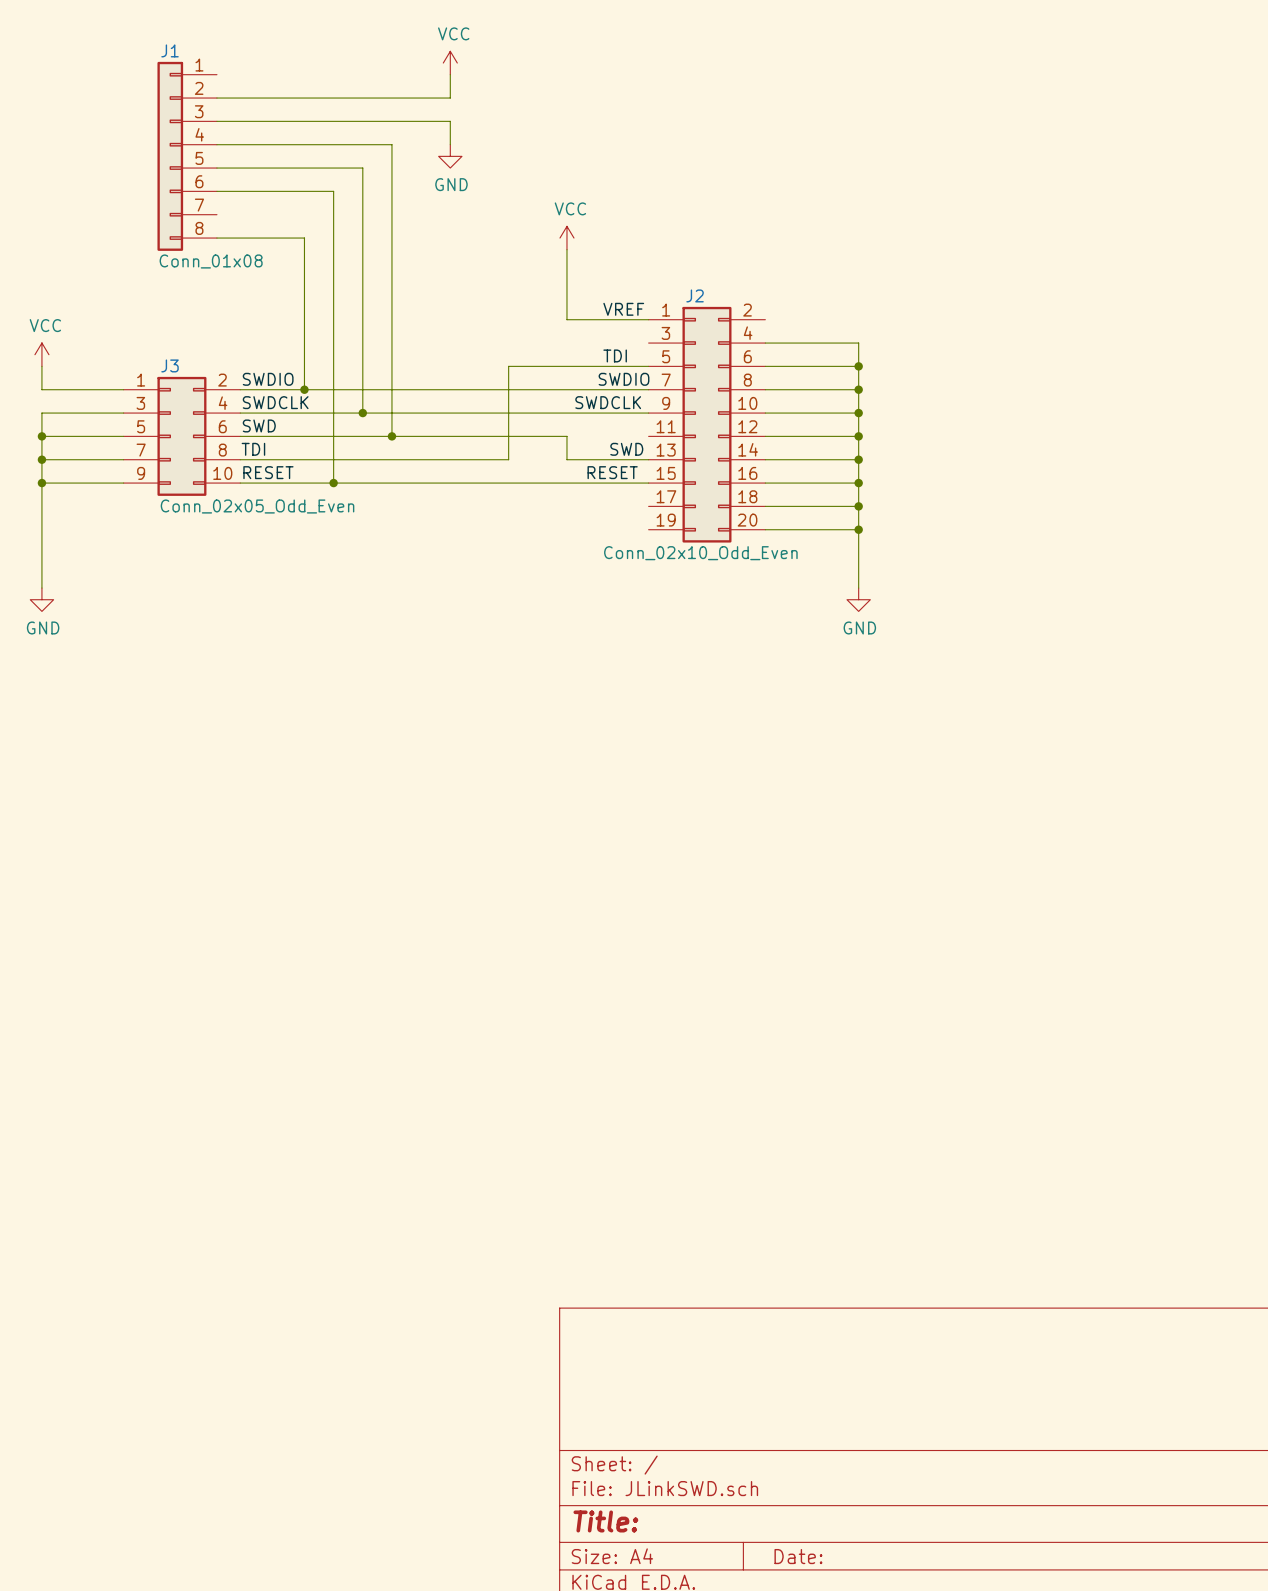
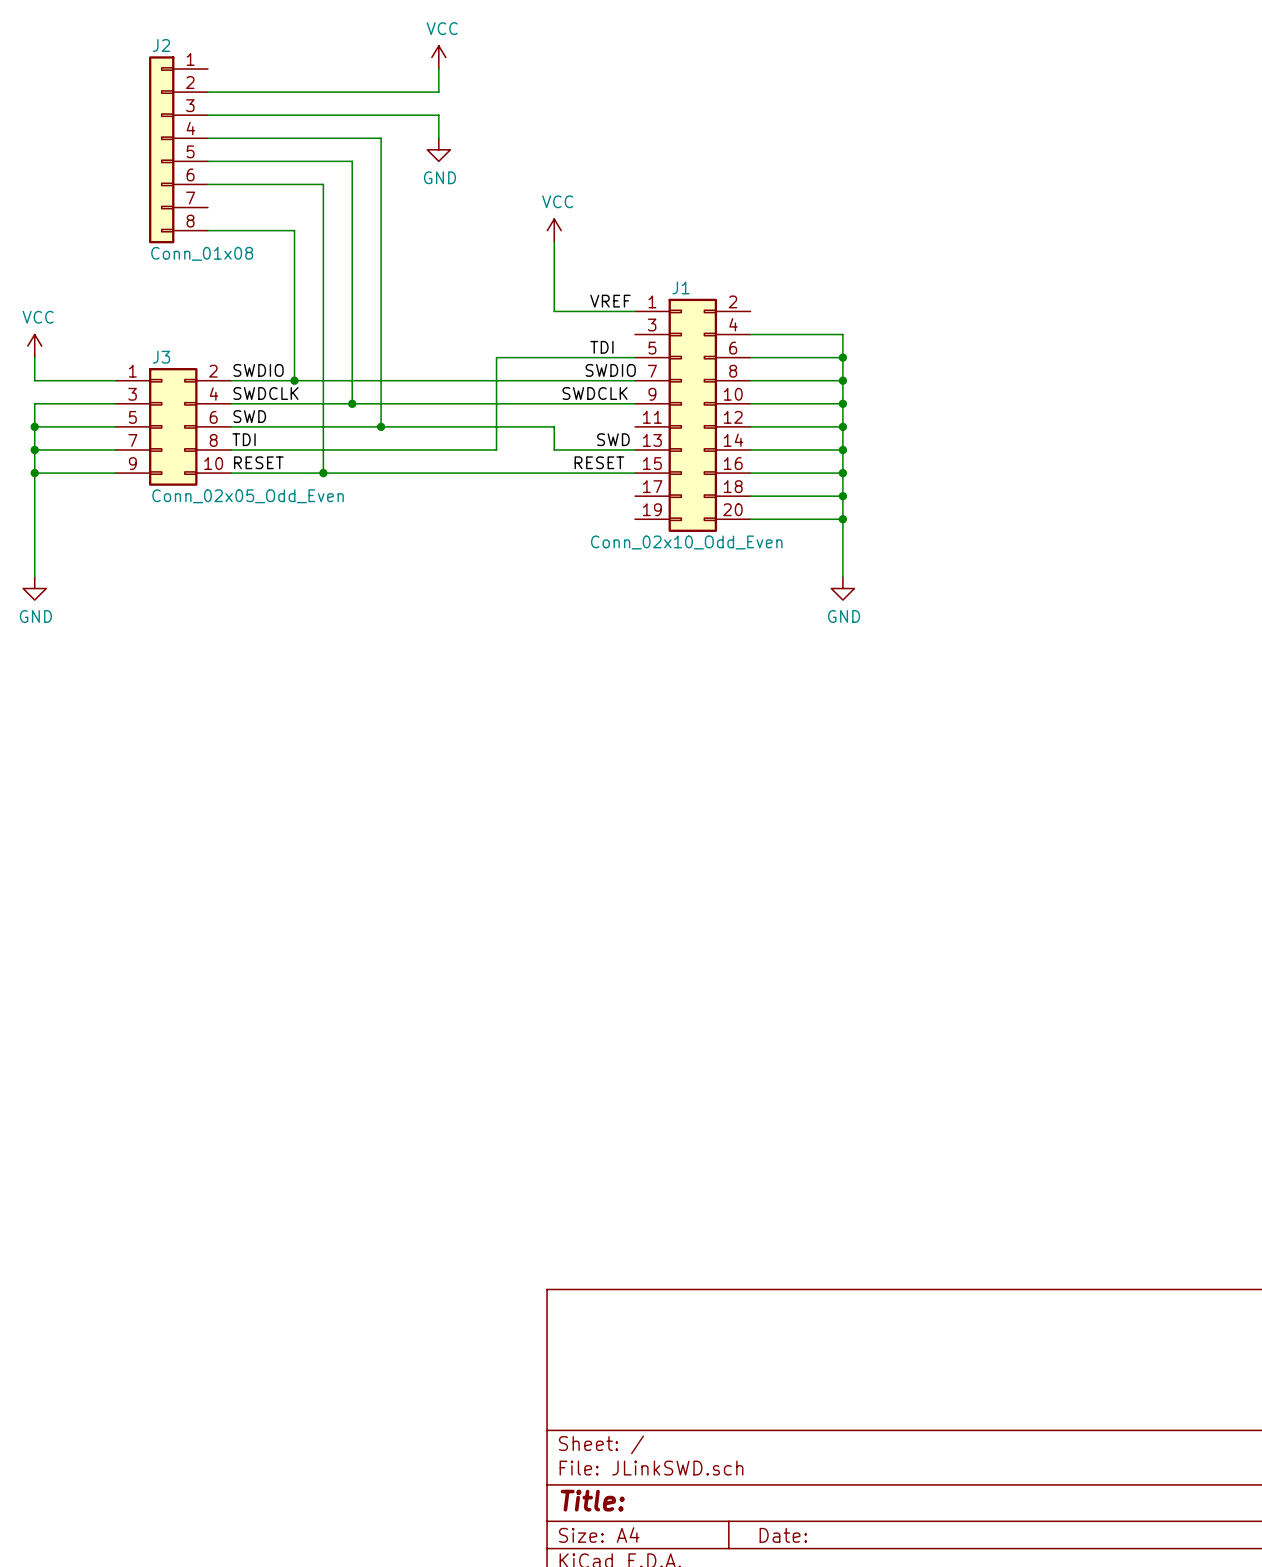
J1 name: J1 (170, 50) -> J2 (161, 45)
J2 name: J2 (695, 295) -> J1 (680, 287)

